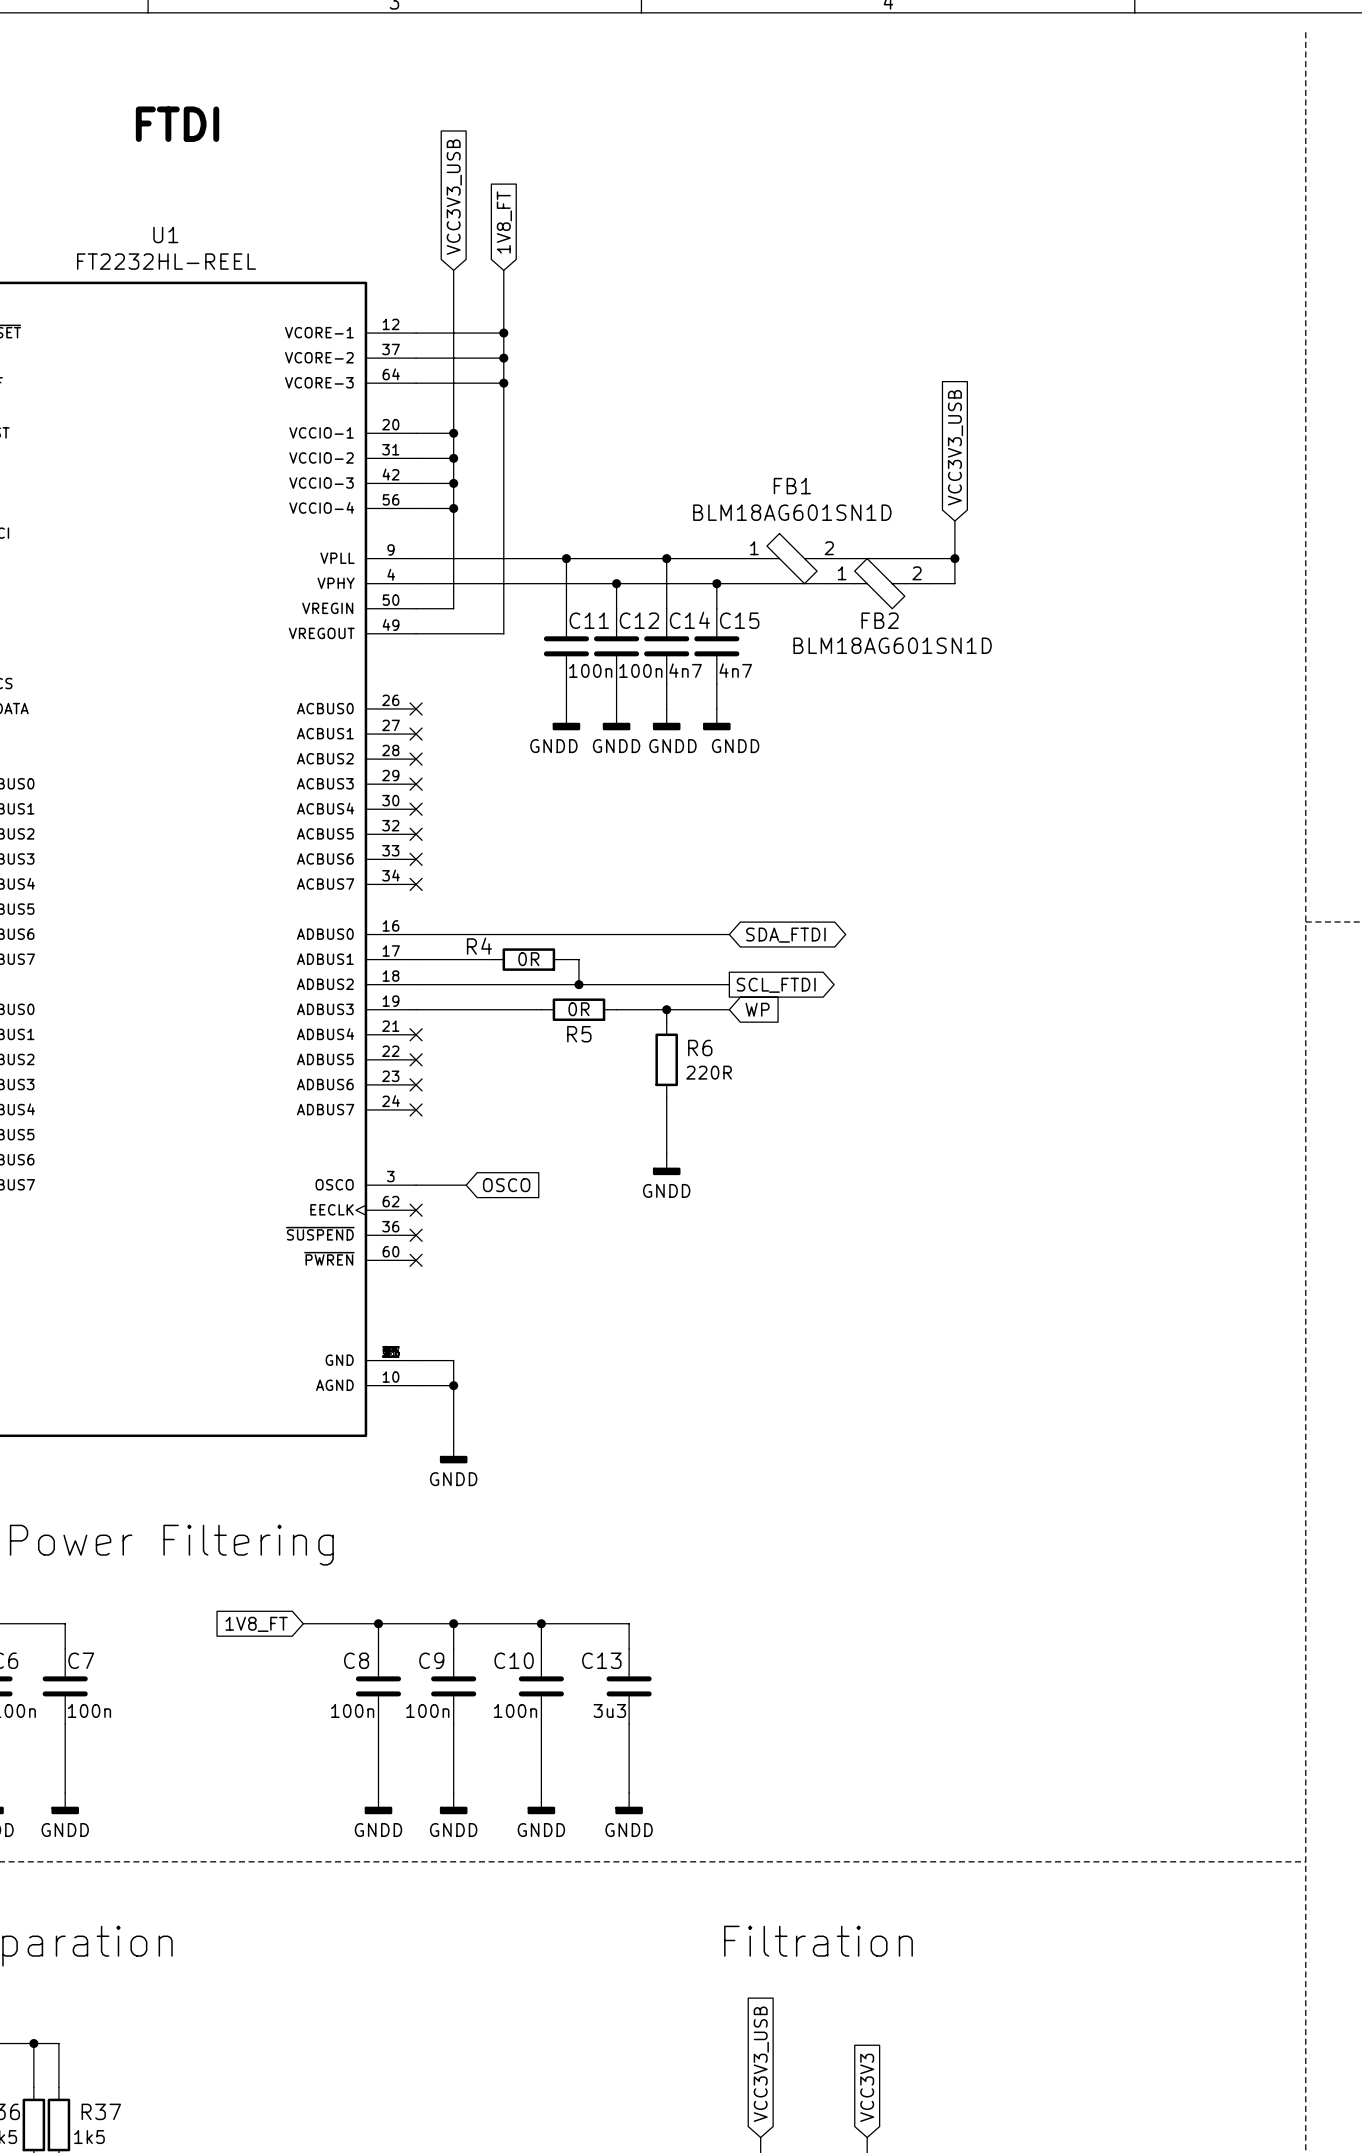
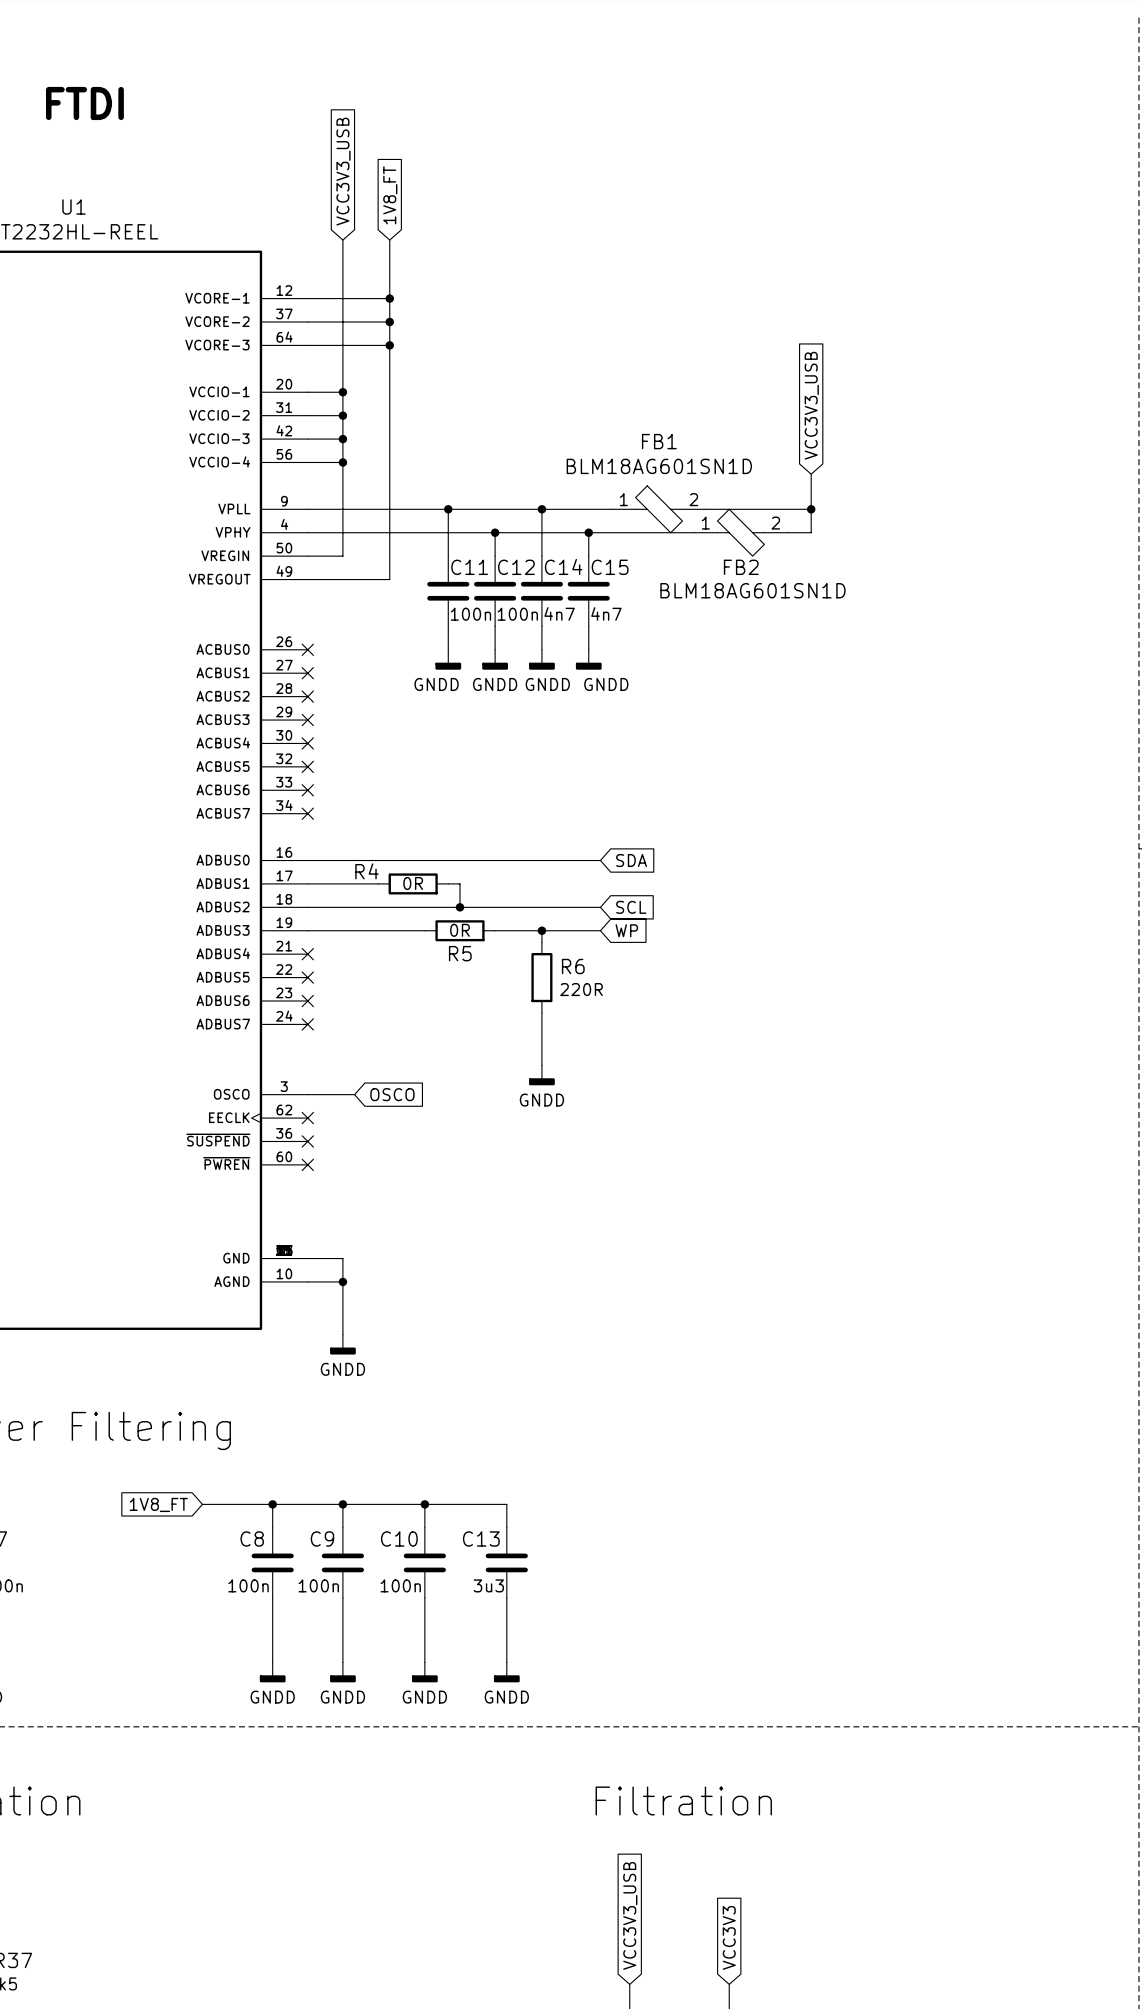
global label shape: bidirectional (785, 935) -> input (631, 860)
global label: SDA_FTDI (785, 935) -> SDA (631, 860)
global label shape: output (776, 985) -> input (631, 907)
global label: SCL_FTDI (776, 985) -> SCL (631, 907)

